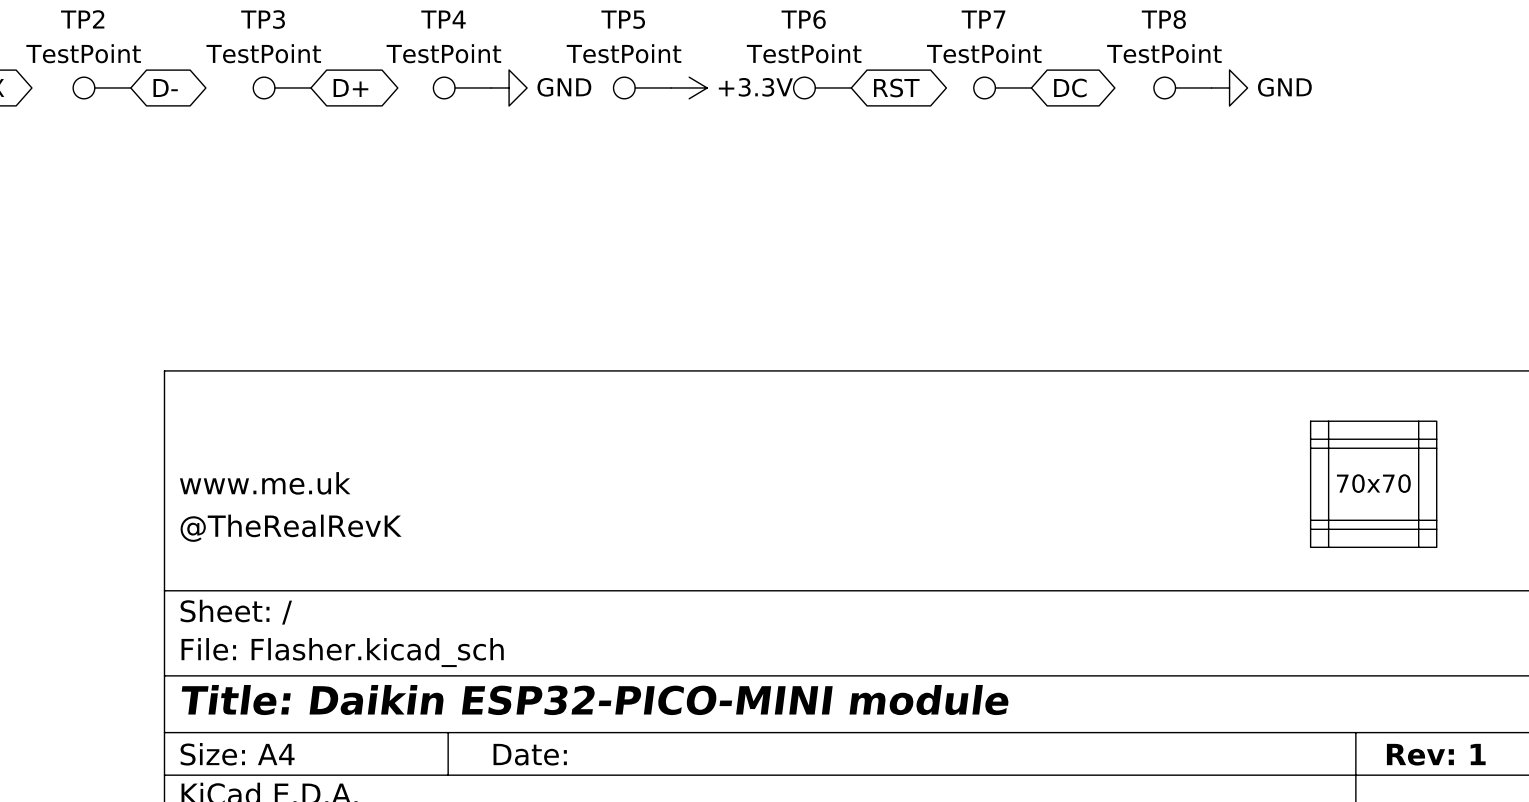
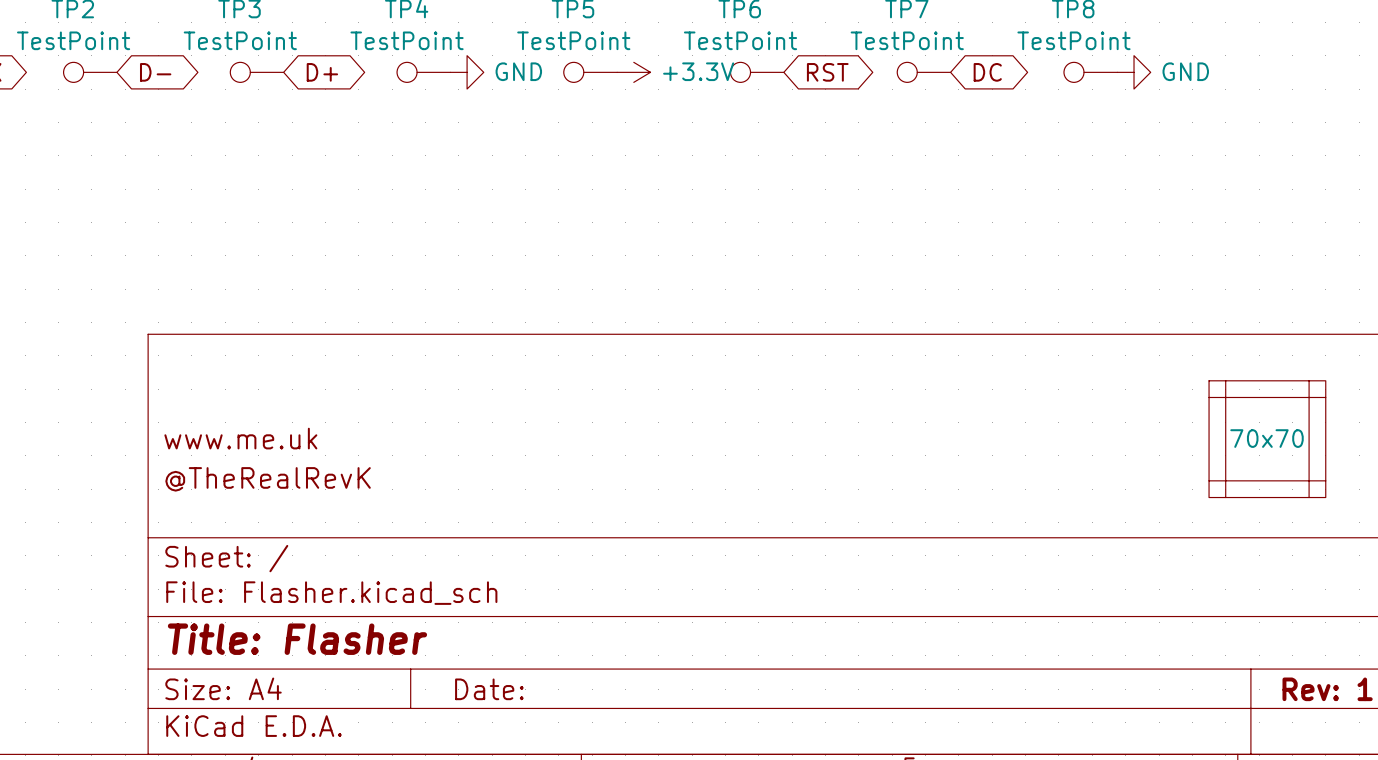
part: (1373, 448) -> none
part: (1373, 520) -> none
title block: Title: Daikin ESP32-PICO-MINI module (595, 700) -> Title: Flasher (297, 639)

